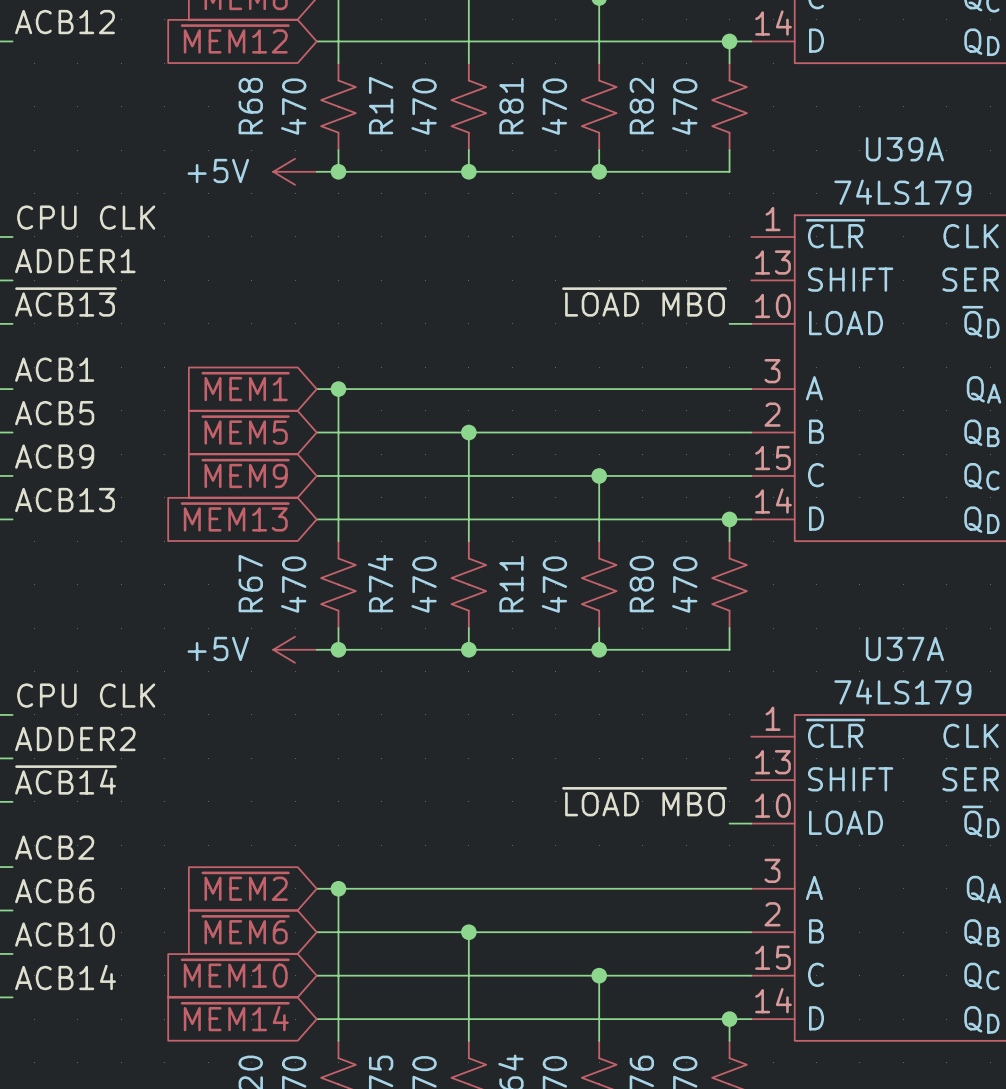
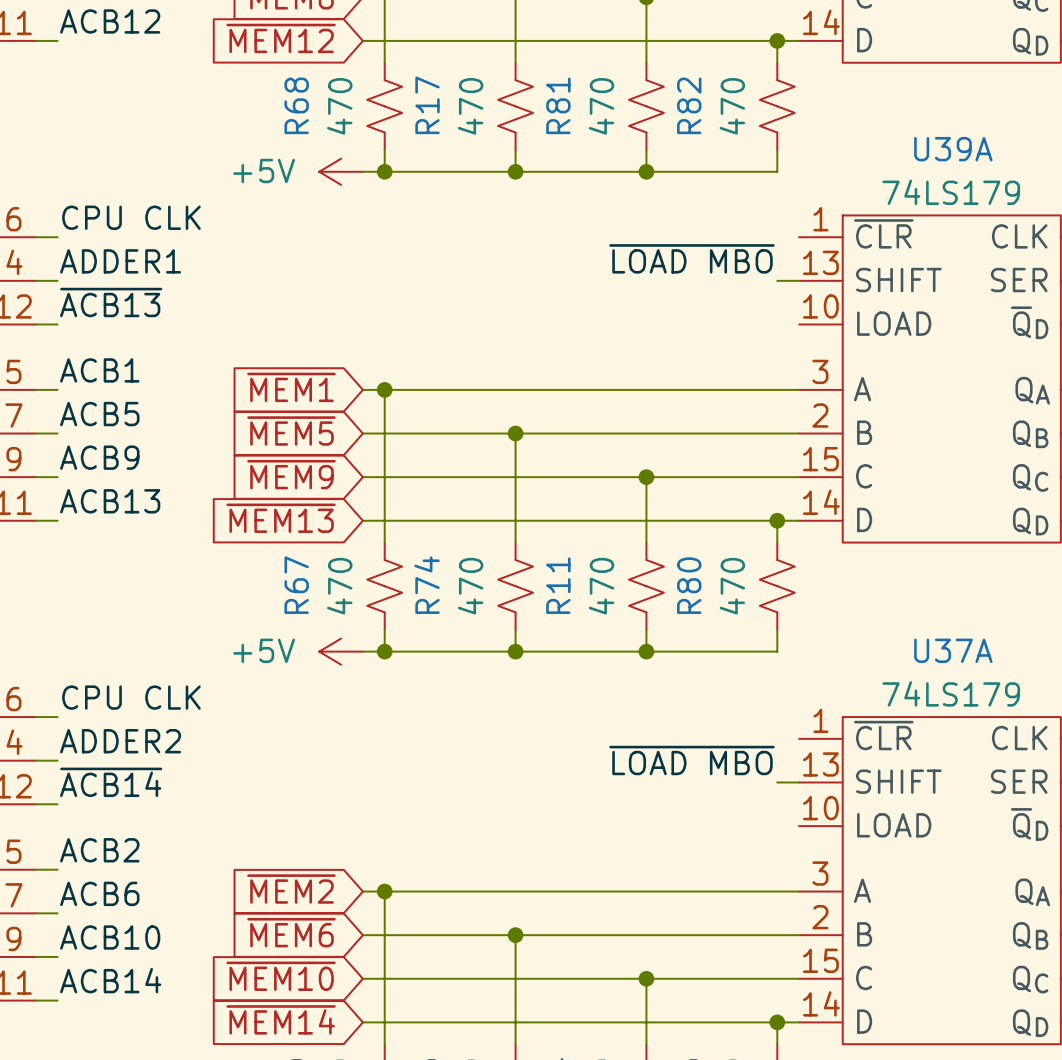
label position: ~{LOAD MBO} (644, 302) -> ~{LOAD MBO} (691, 258)
wire: (729, 323) (751, 323) -> (777, 280) (799, 280)
label position: ~{LOAD MBO} (644, 801) -> ~{LOAD MBO} (691, 760)
wire: (729, 823) (751, 823) -> (777, 782) (799, 782)

